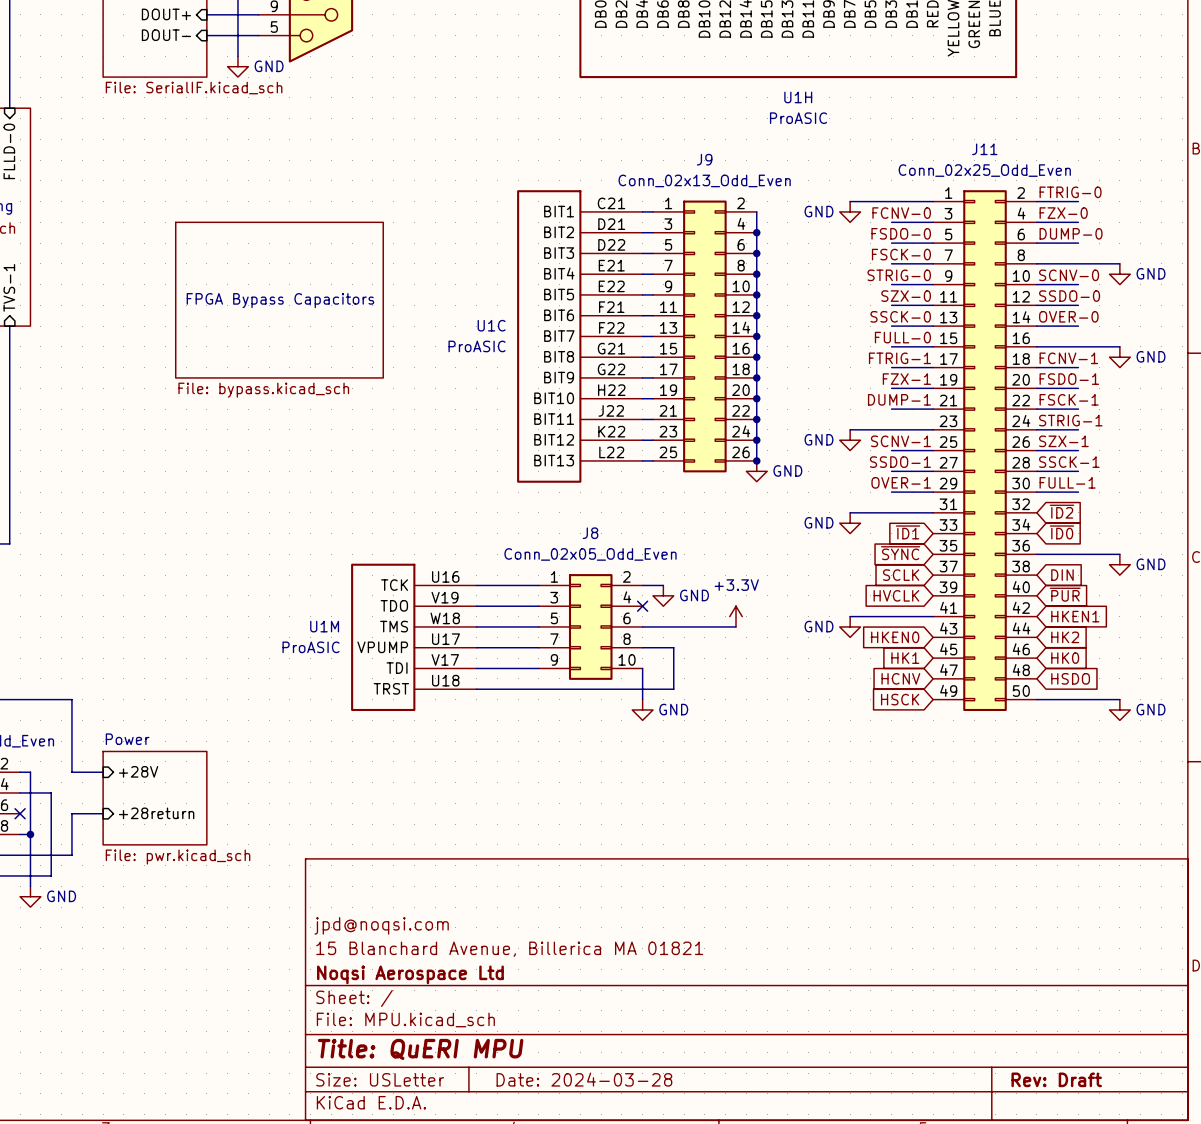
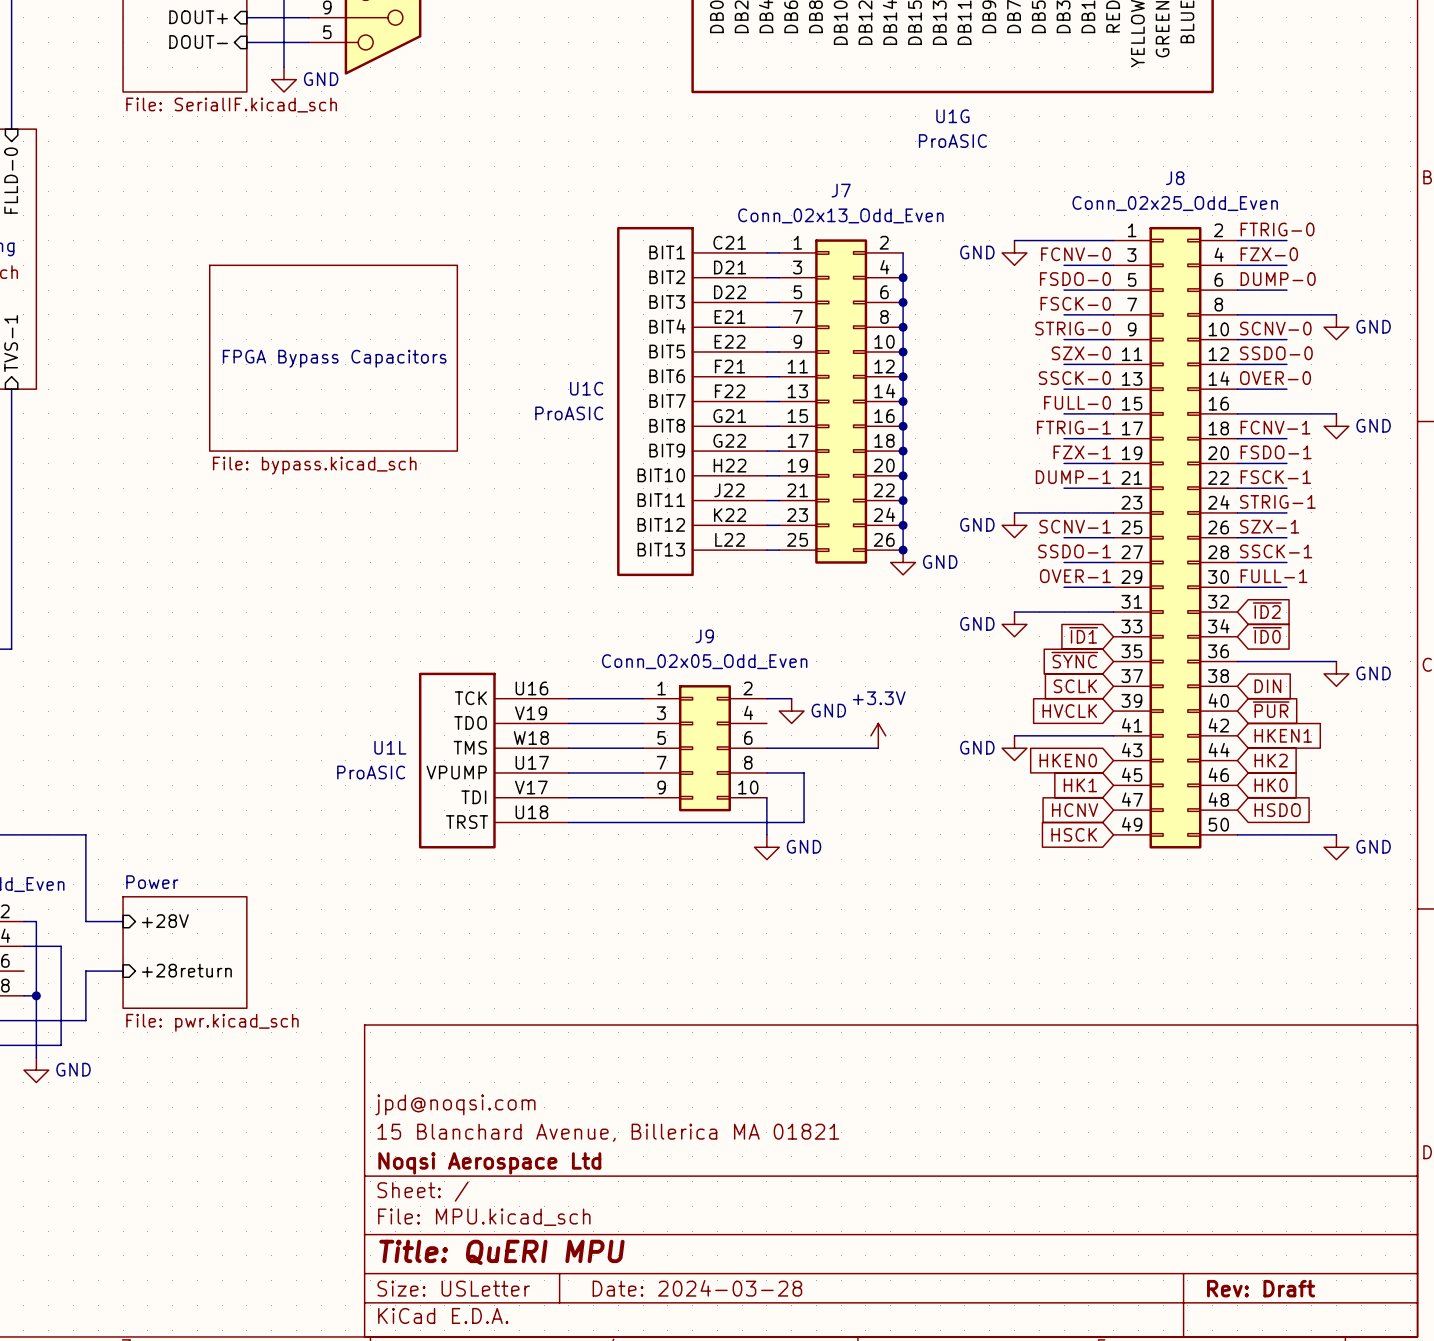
U1H name: U1H (798, 97) -> U1G (952, 116)
J11 name: J11 (984, 149) -> J8 (1175, 178)
J9 name: J9 (704, 159) -> J7 (841, 190)
J8 name: J8 (590, 533) -> J9 (704, 636)
no-connect mark: (642, 606) -> none
U1M name: U1M (324, 626) -> U1L (390, 747)
no-connect mark: (20, 813) -> none

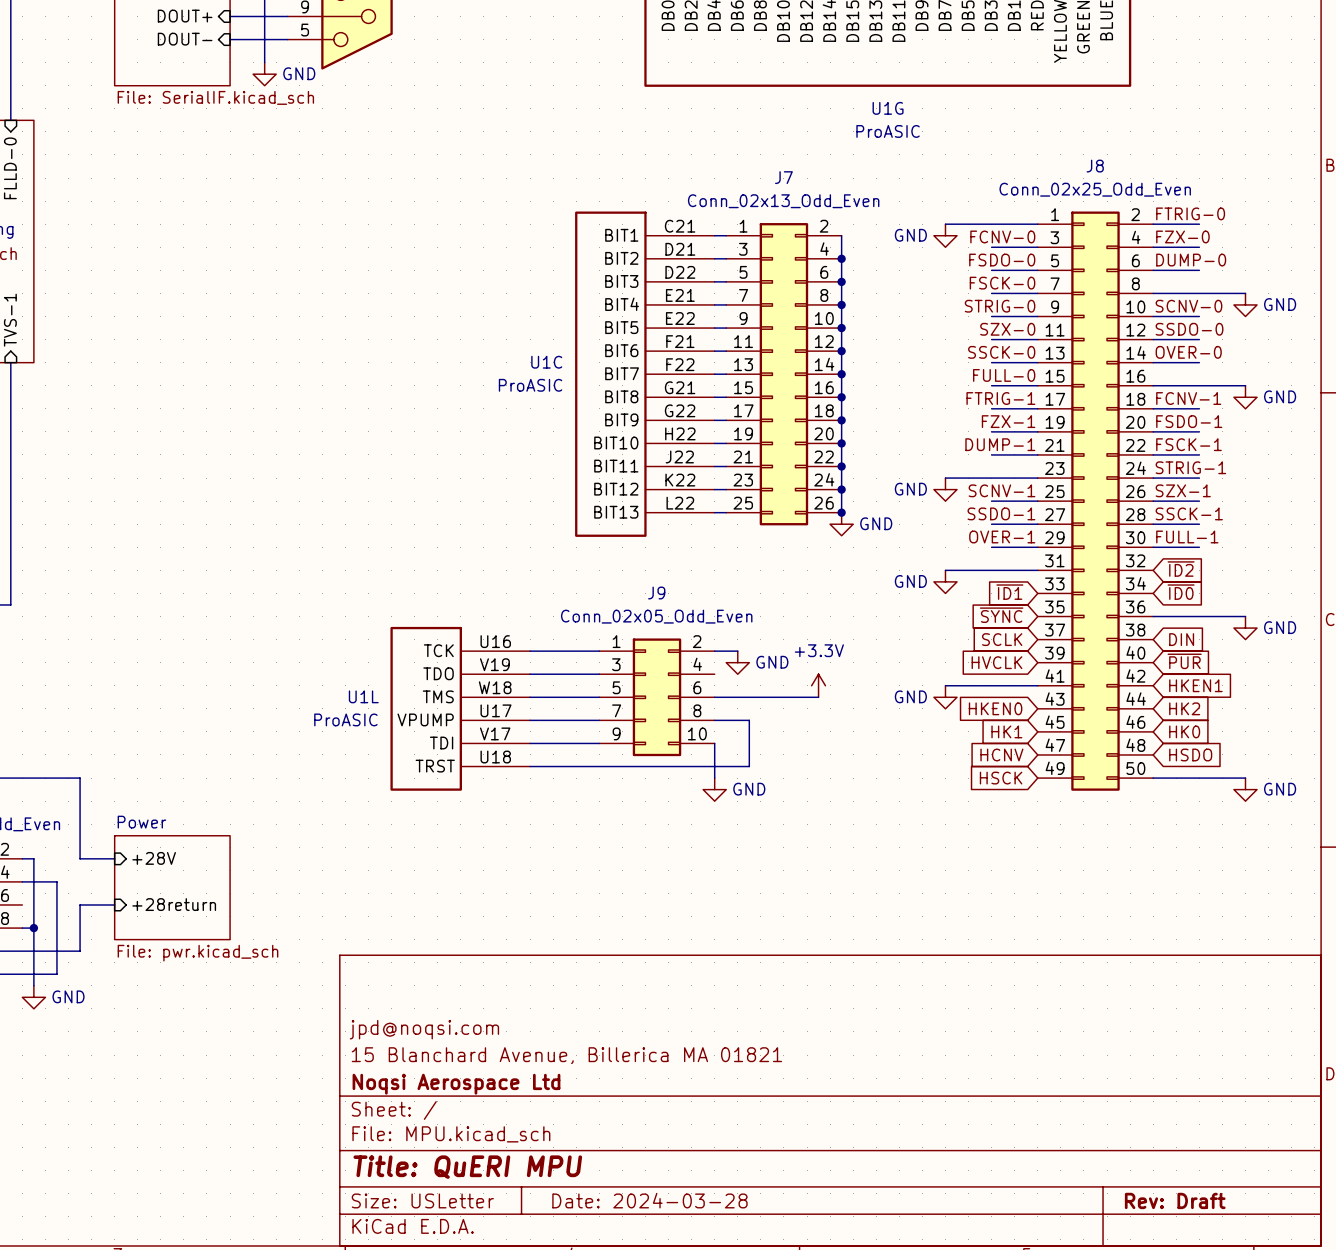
sheet FPGA Bypass Capacitors: File: bypass.kicad_sch (333, 358) -> none

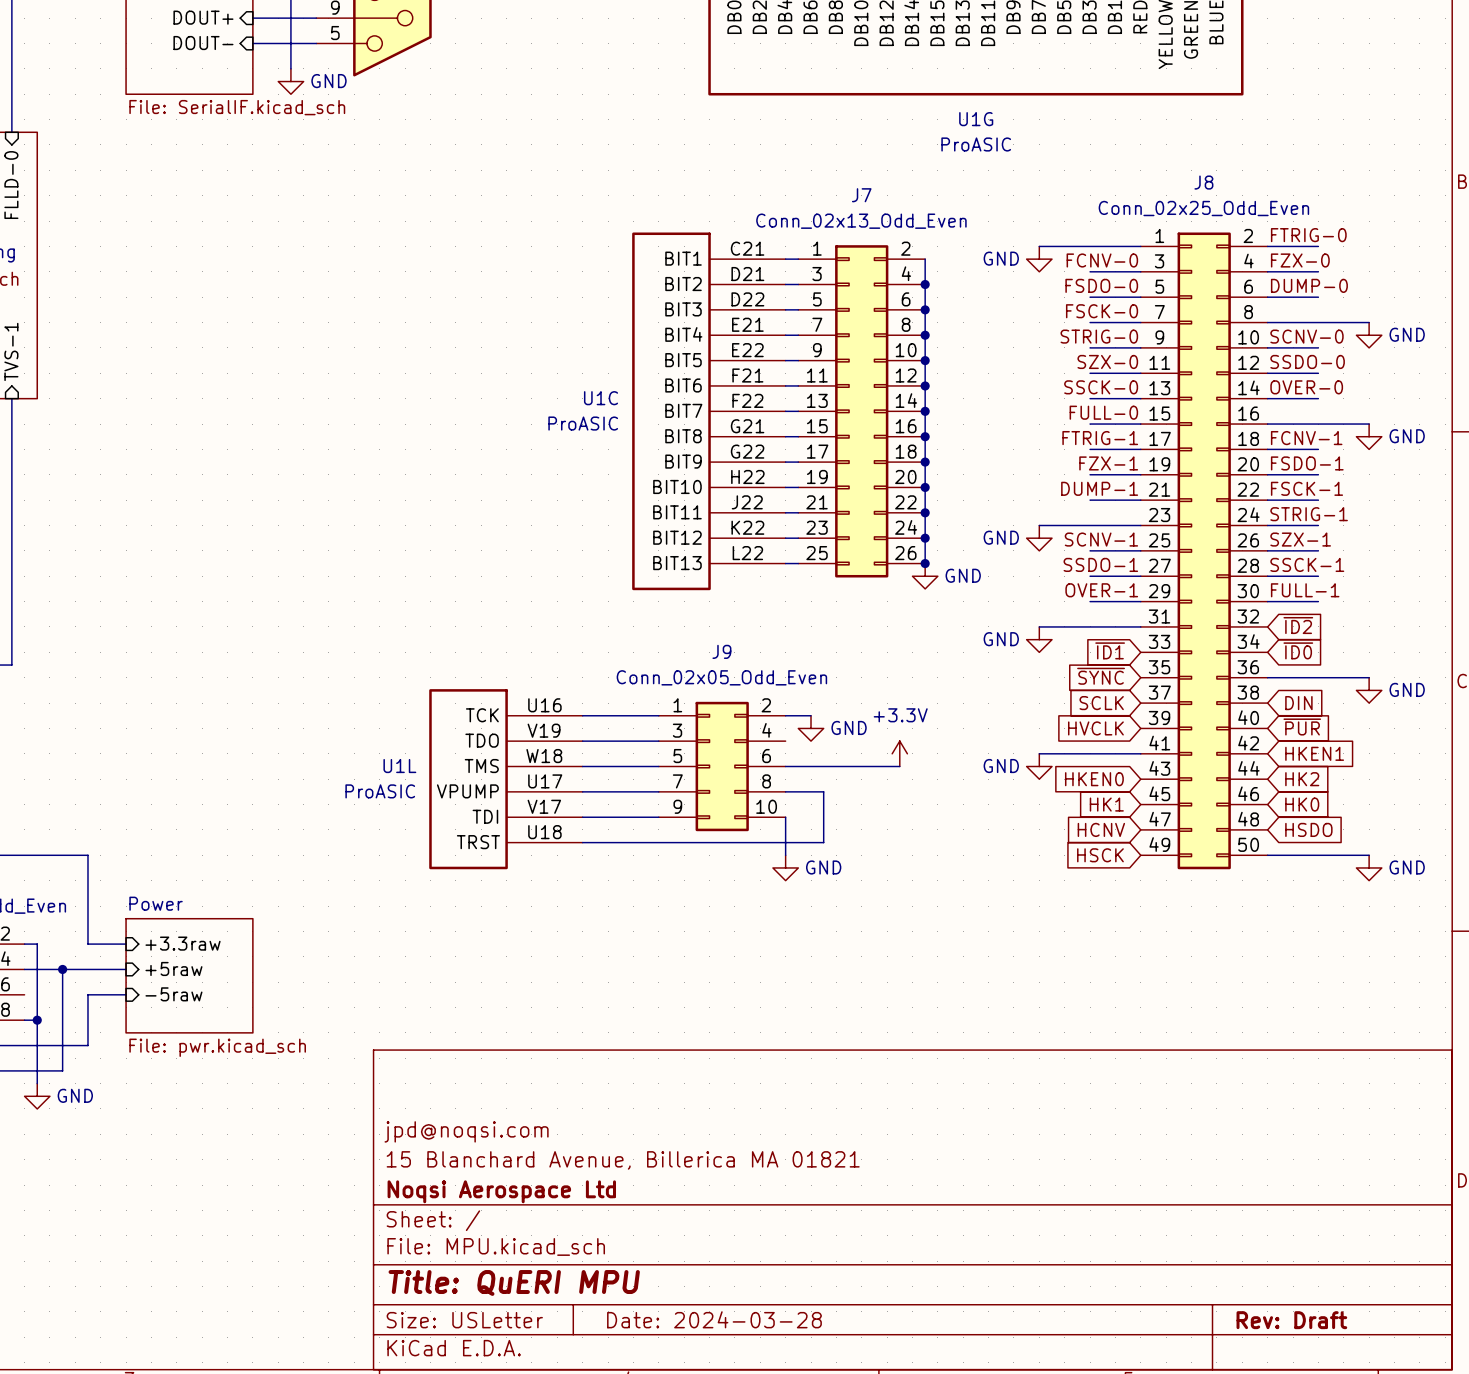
sheet pin: +28V (154, 858) -> +3.3raw (183, 943)
wire: none -> (62, 969) (126, 969)
junction: none -> (62, 969)
sheet pin: none -> +5raw (173, 968)
sheet pin: +28return (174, 904) -> -5raw (173, 994)

